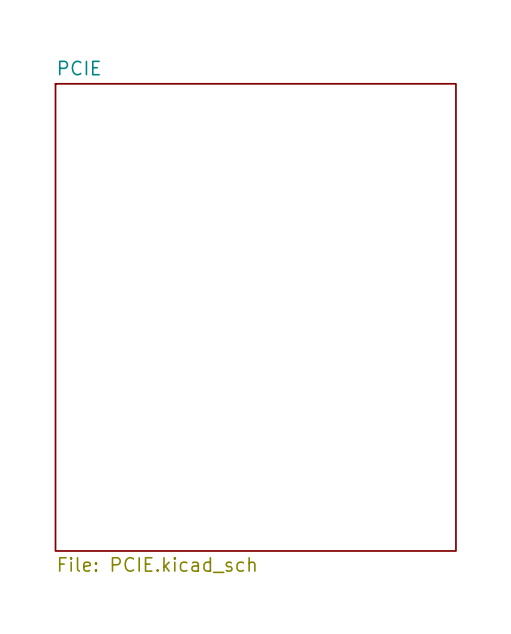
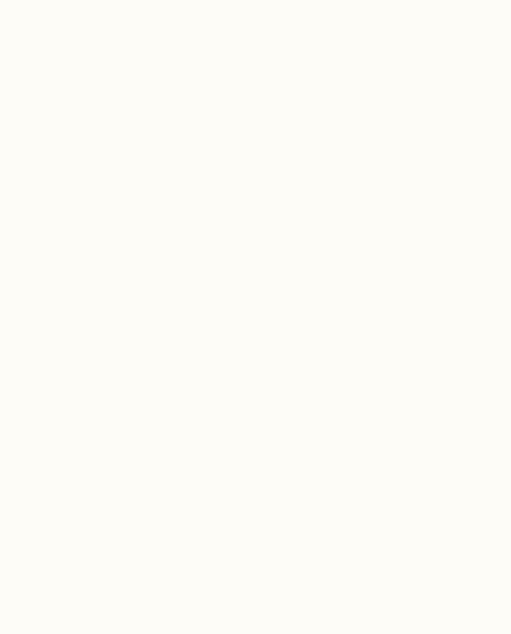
sheet PCIE: File: PCIE.kicad_sch (255, 317) -> none

